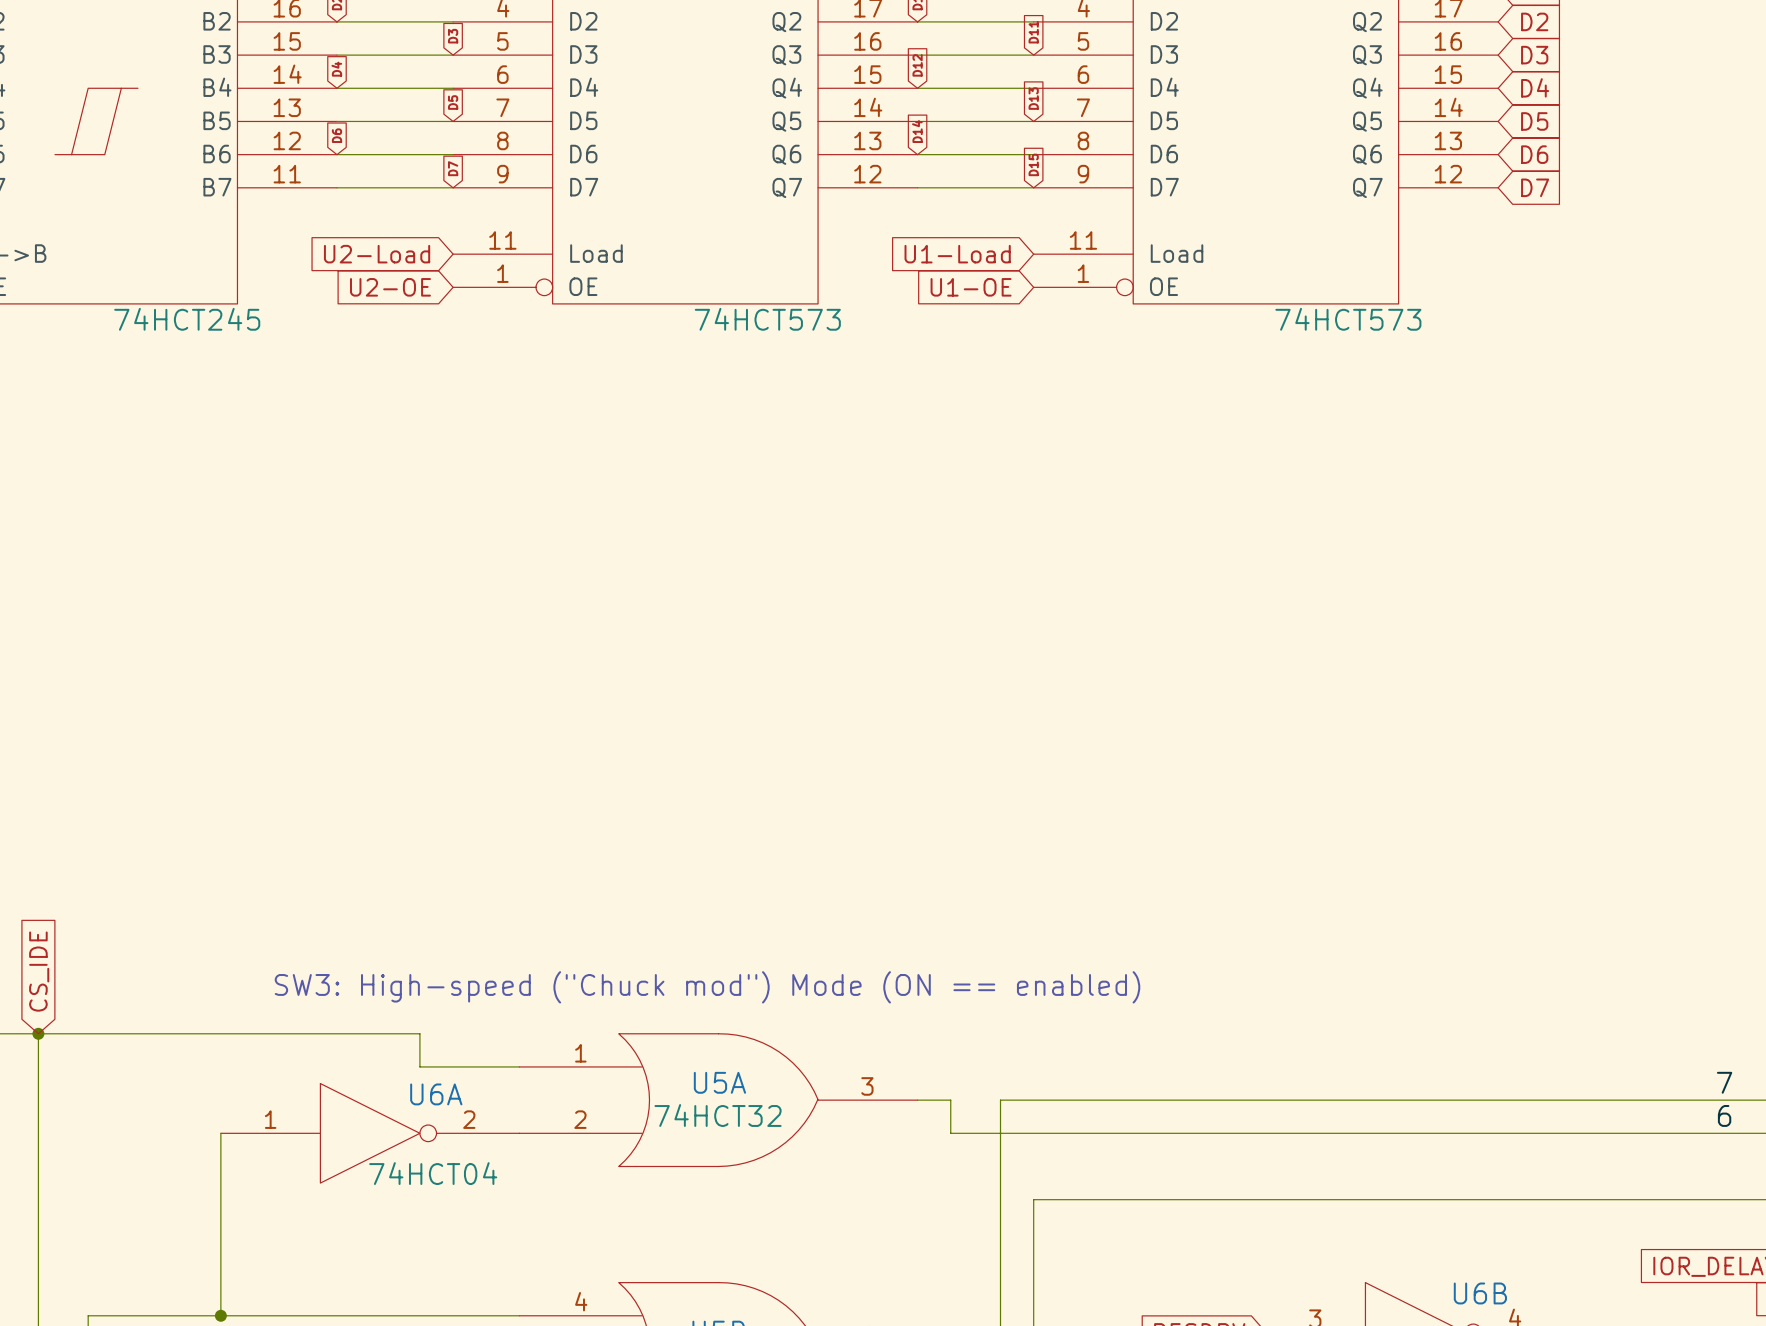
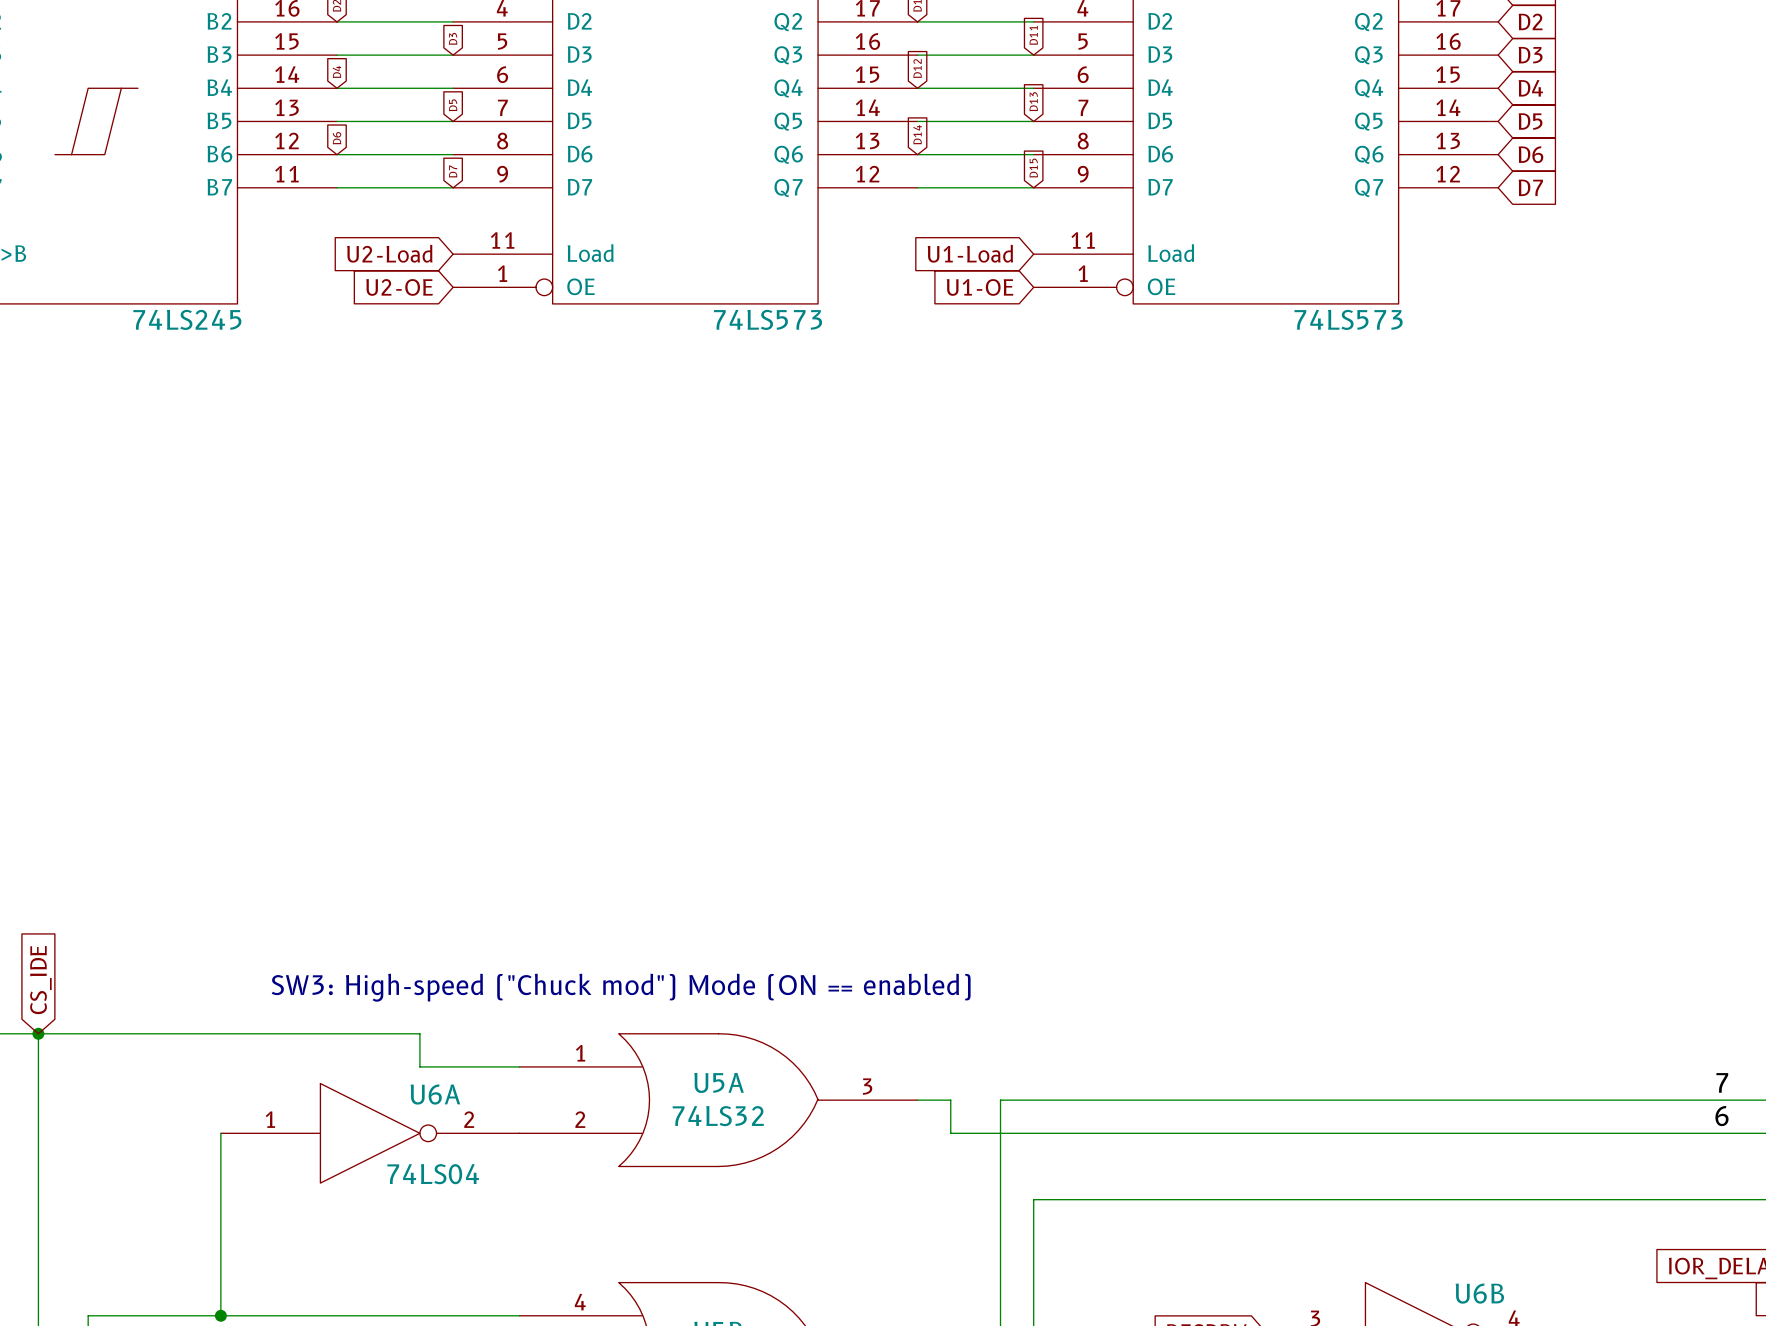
part value: 74HCT245 (187, 319) -> 74LS245 (187, 319)
part value: 74HCT573 (767, 319) -> 74LS573 (768, 319)
part value: 74HCT573 (1348, 319) -> 74LS573 (1348, 319)
U5A value: 74HCT32 (718, 1115) -> 74LS32 (718, 1116)
U6A value: 74HCT04 (433, 1173) -> 74LS04 (433, 1174)

